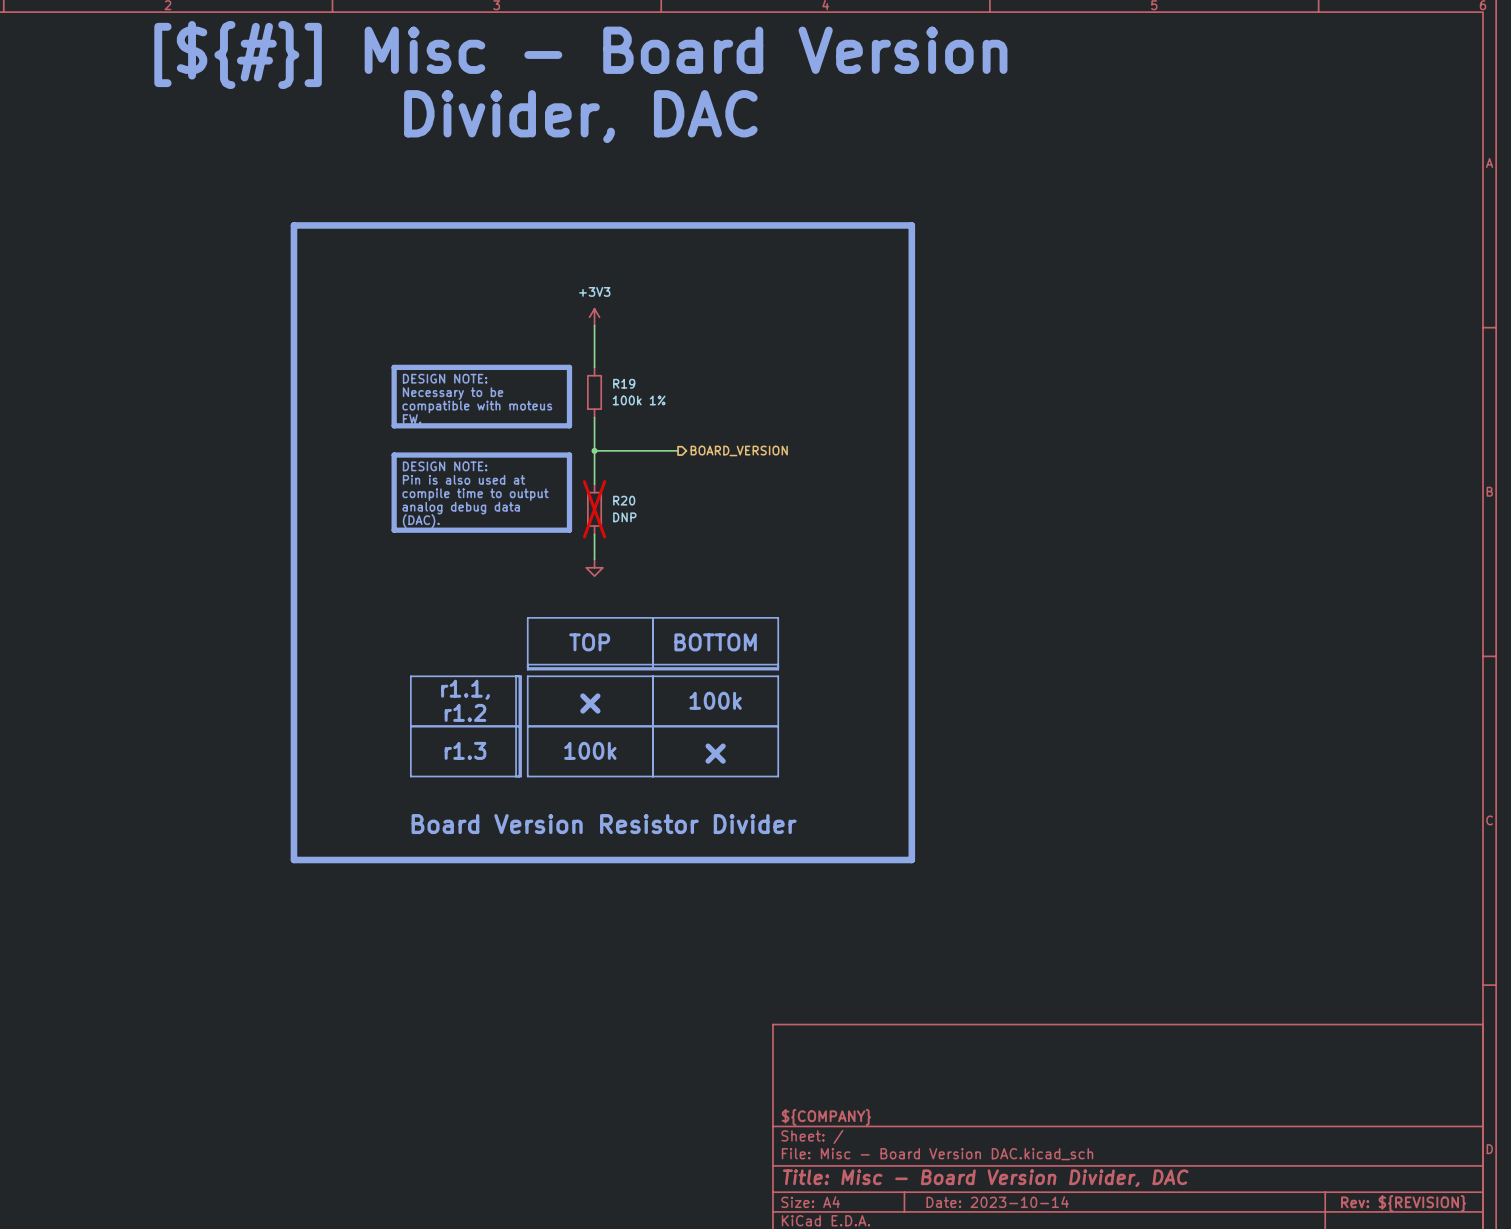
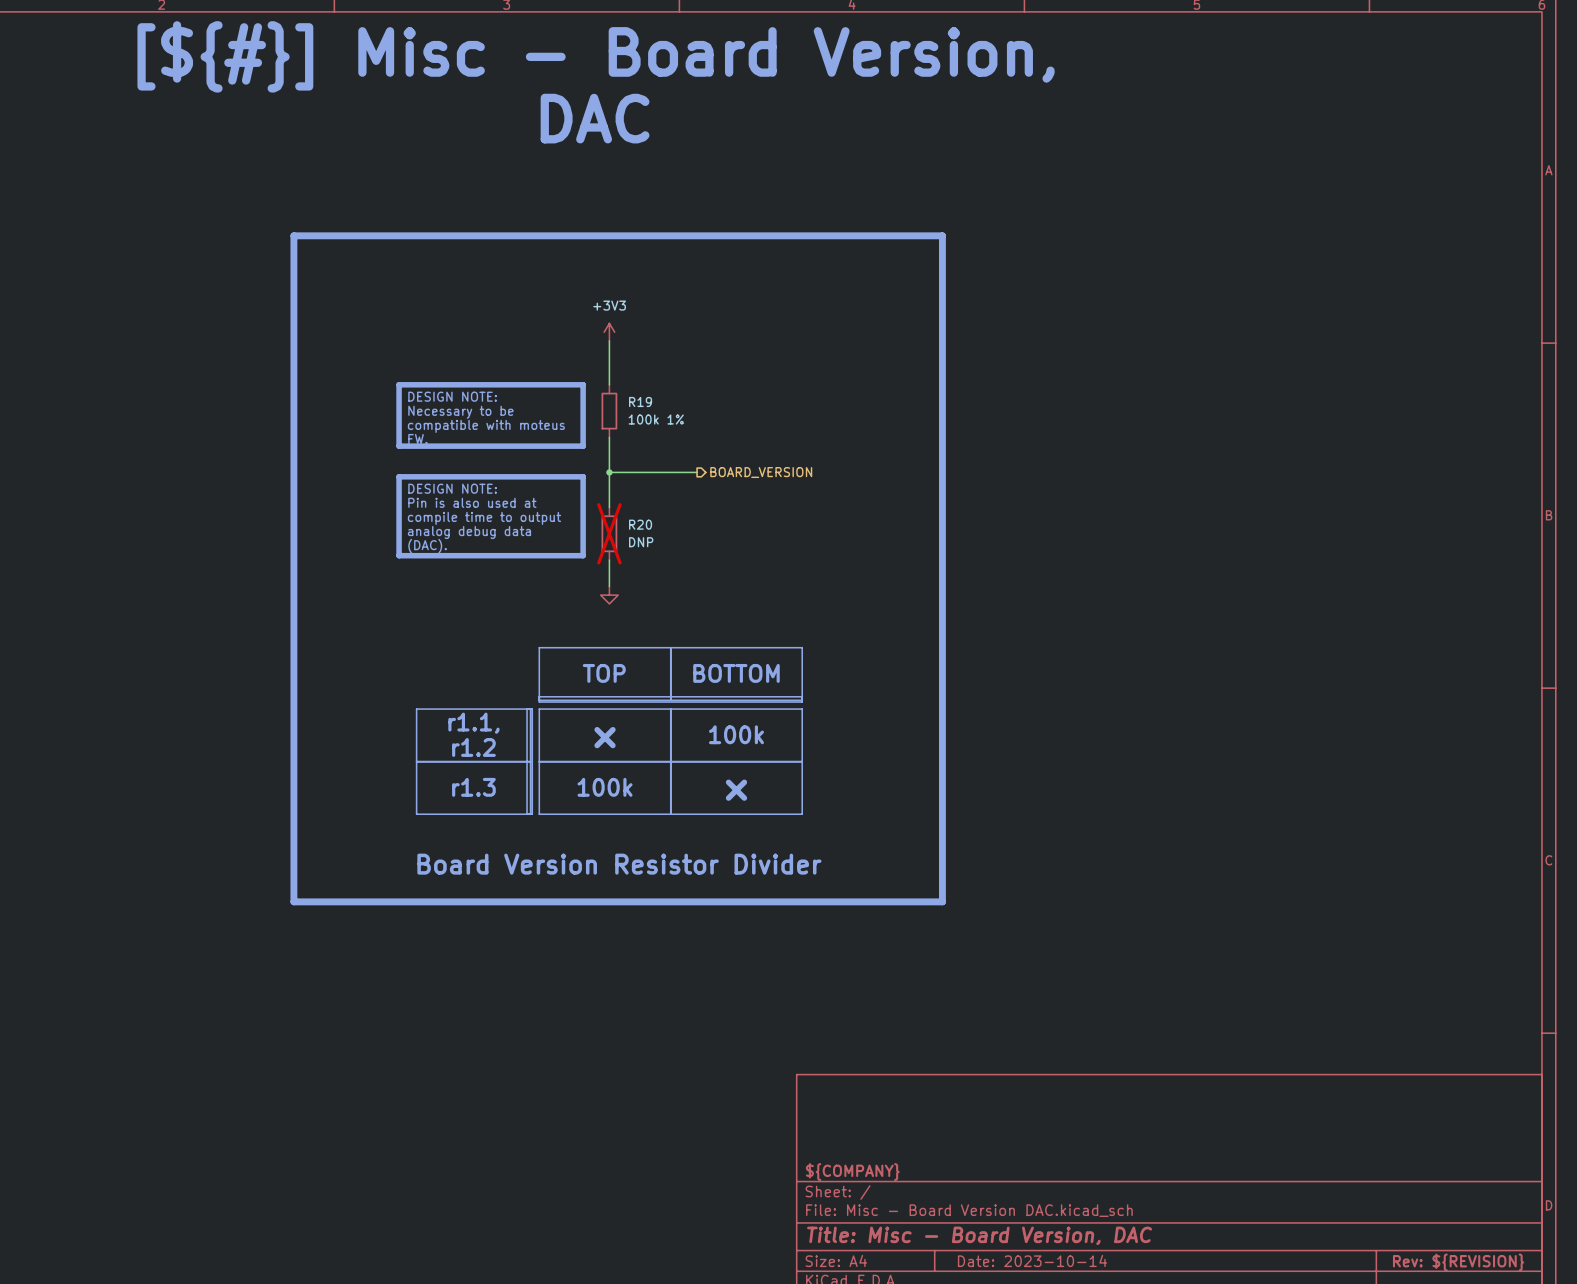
text: [${#}] Misc - Board Version (580, 54) -> [${#}] Misc - Board Version, (596, 56)
text: Divider, DAC (580, 116) -> DAC (595, 118)
title block: Title: Misc - Board Version Divider, DAC (985, 1178) -> Title: Misc - Board Version, DAC (979, 1235)

